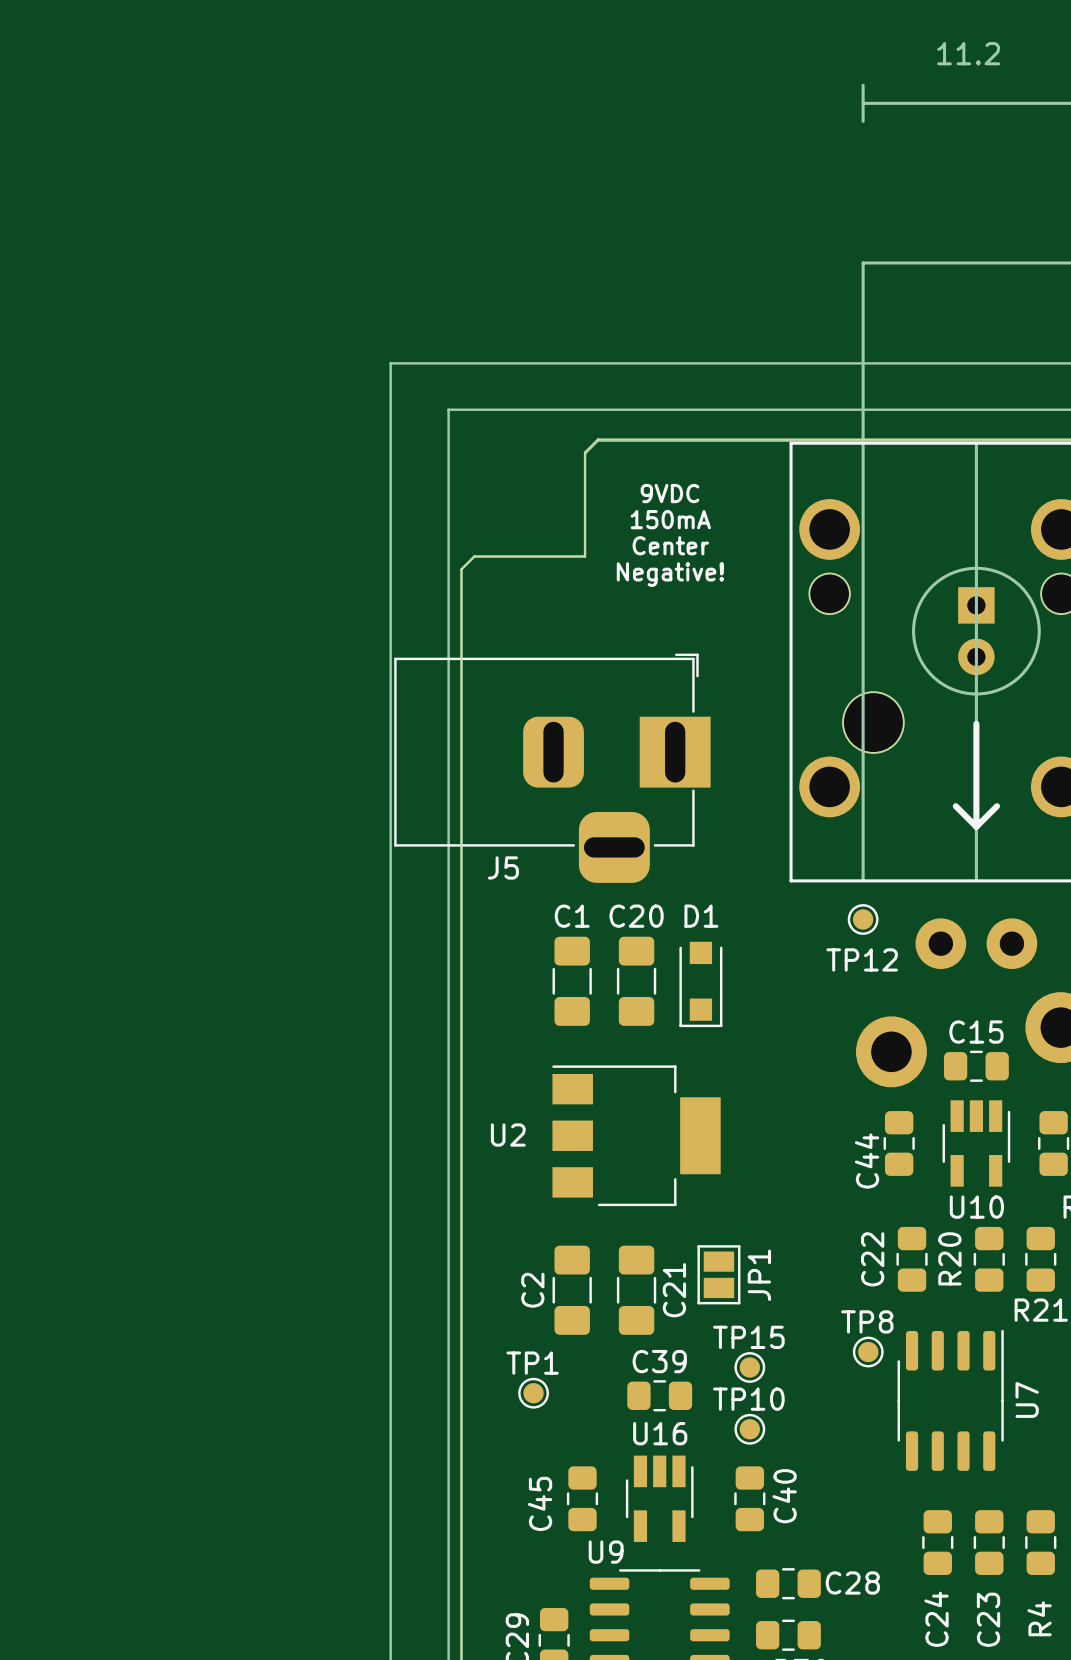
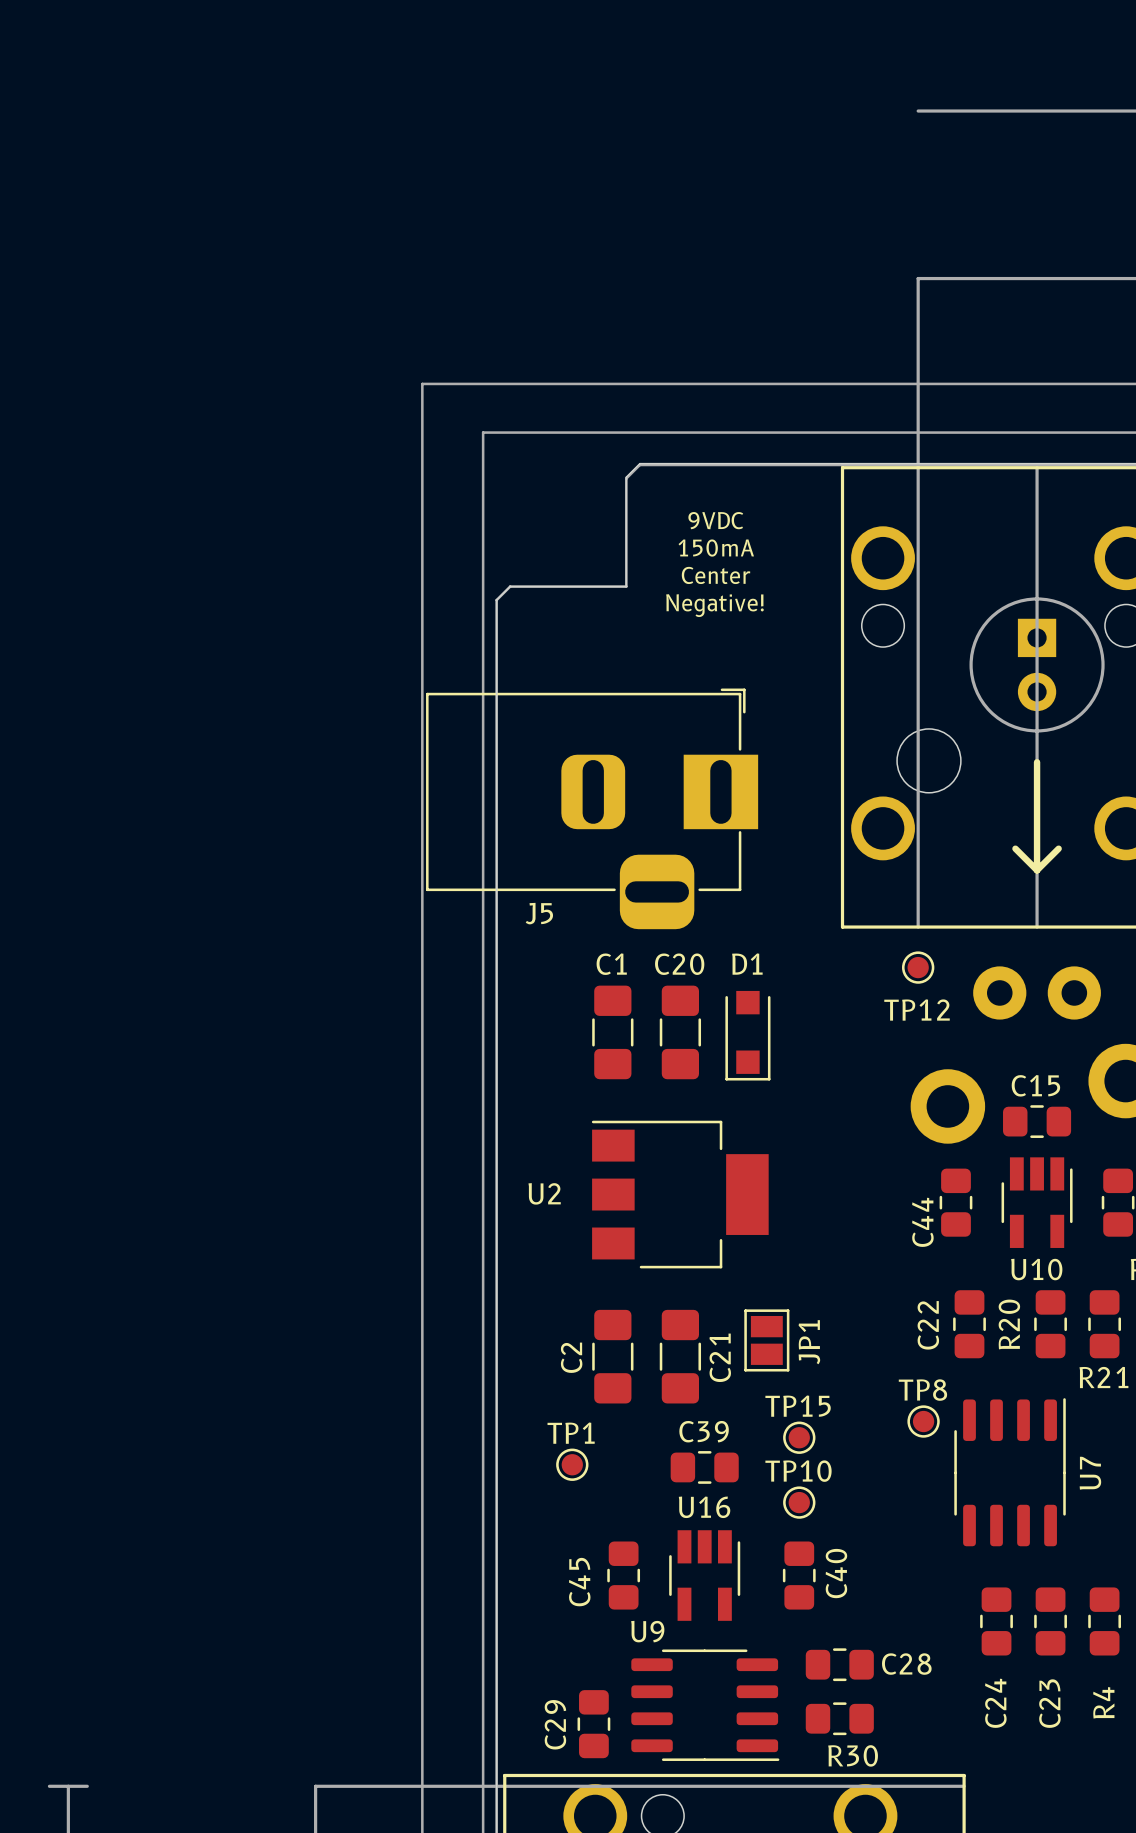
text: 11.2 (968, 53) -> none
line: (863, 85) (863, 121) -> none

